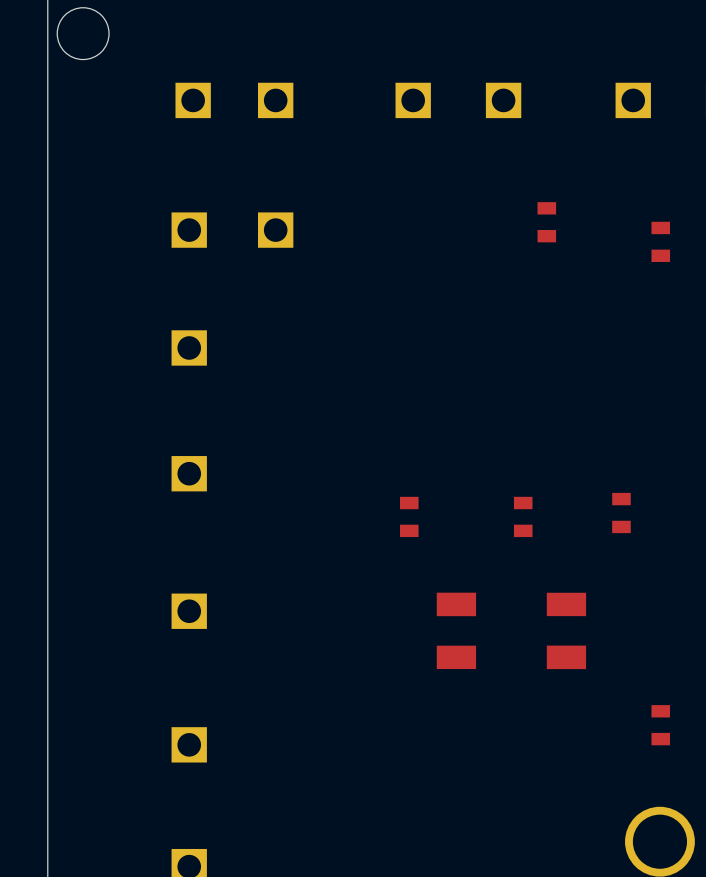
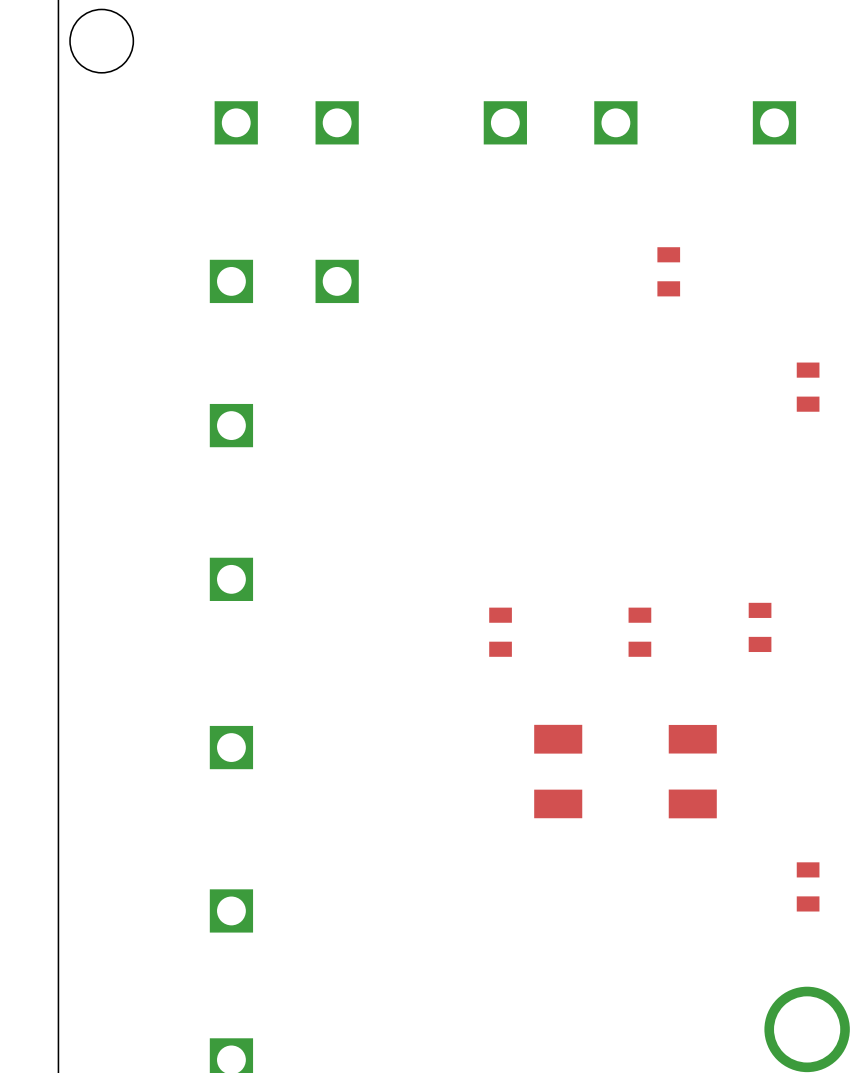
part position: (660, 241) -> (808, 387)

